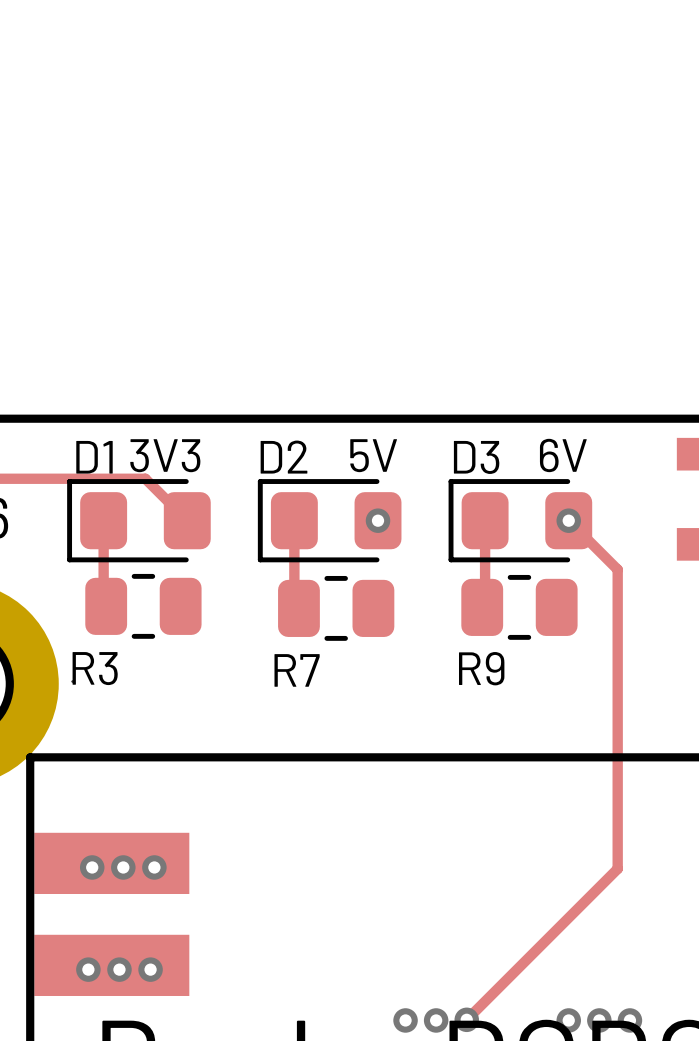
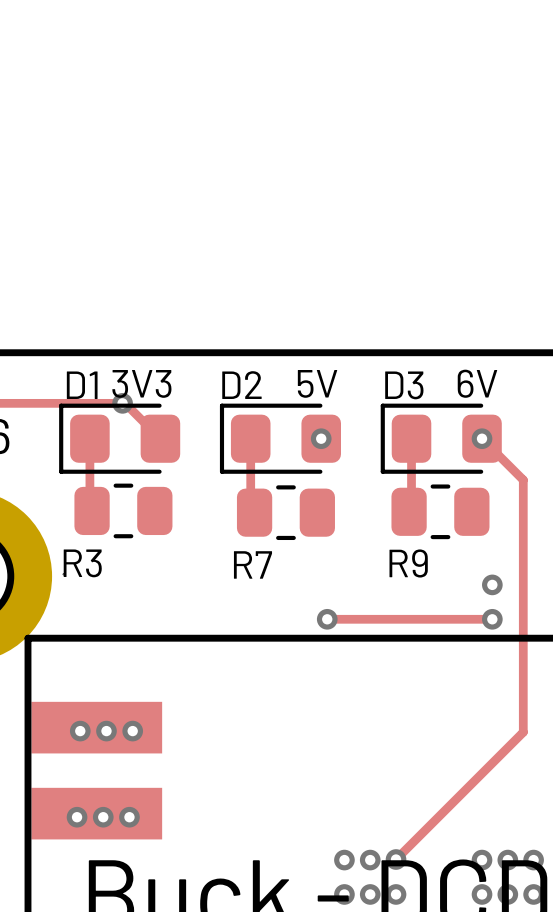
via: none -> (122, 403)
via: none -> (492, 584)
track: none -> (327, 619) (492, 619)
via: none -> (327, 619)
via: none -> (492, 619)

